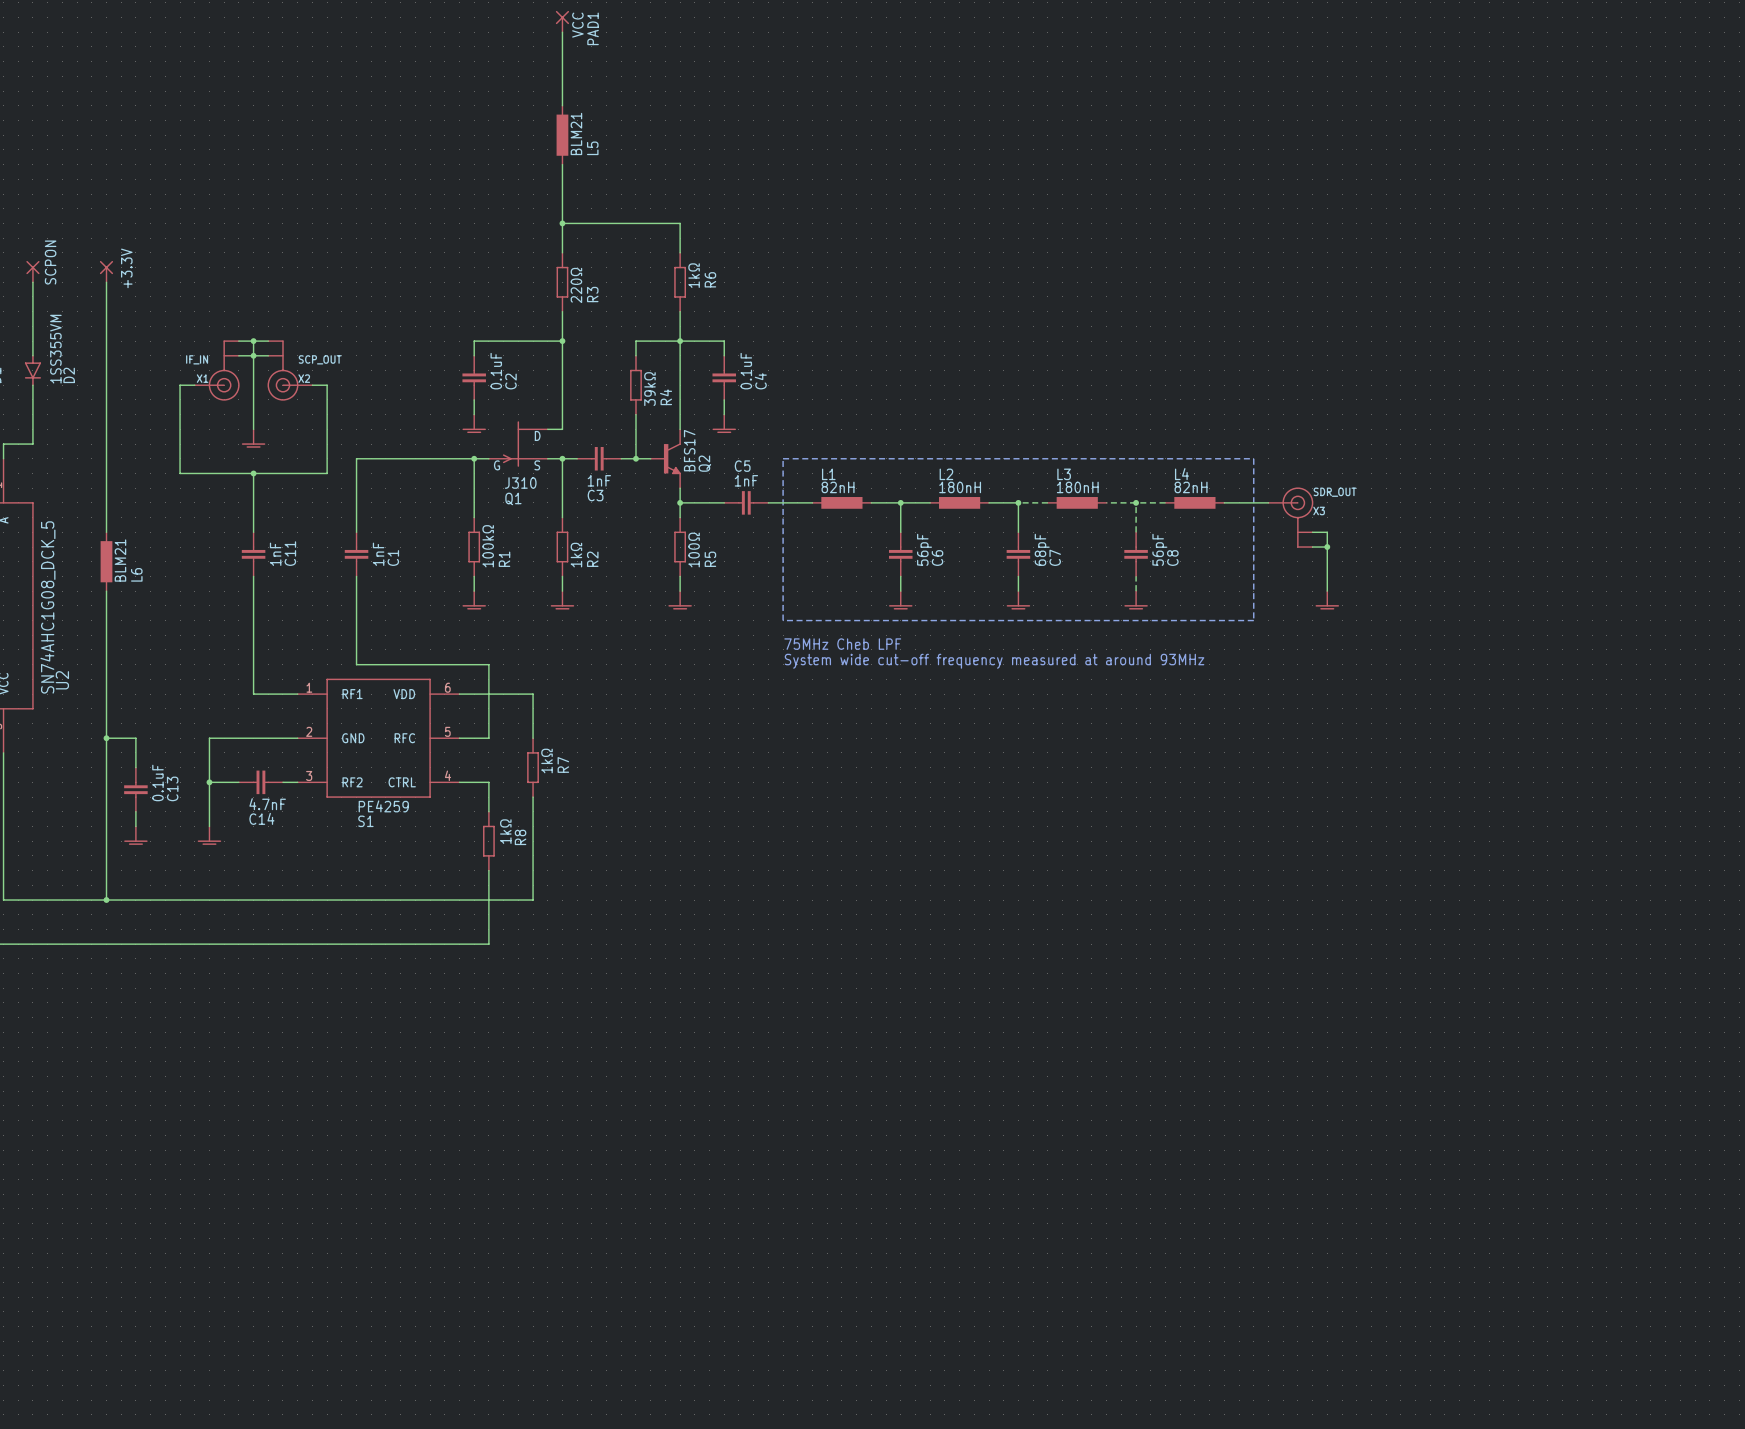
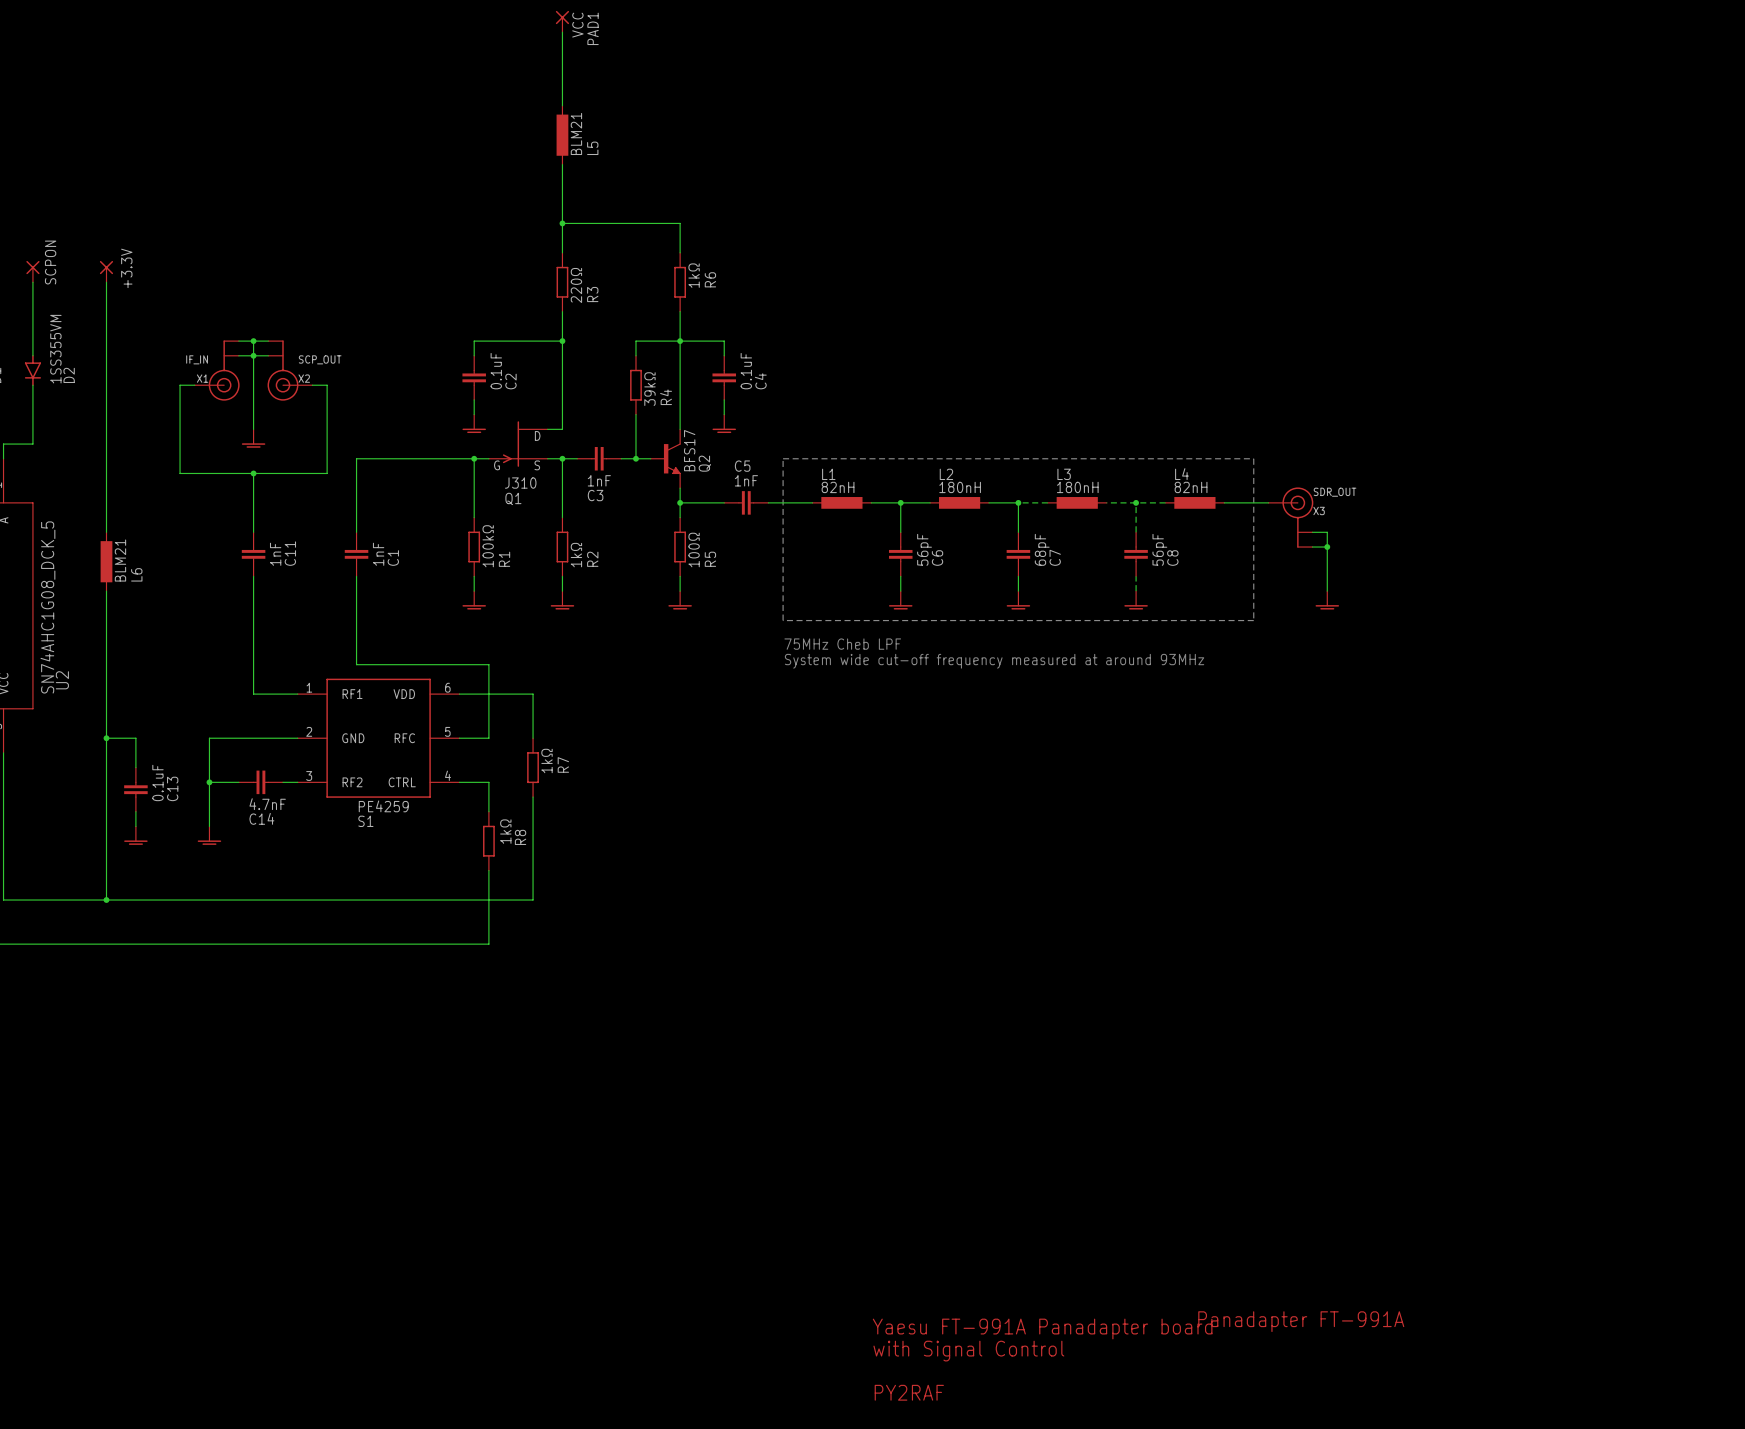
text: none -> Panadapter FT-991A (1301, 1321)
text: none -> Yaesu FT-991A Panadapter board (1042, 1329)
text: none -> with Signal Control (968, 1351)
text: none -> PY2RAF (909, 1392)

